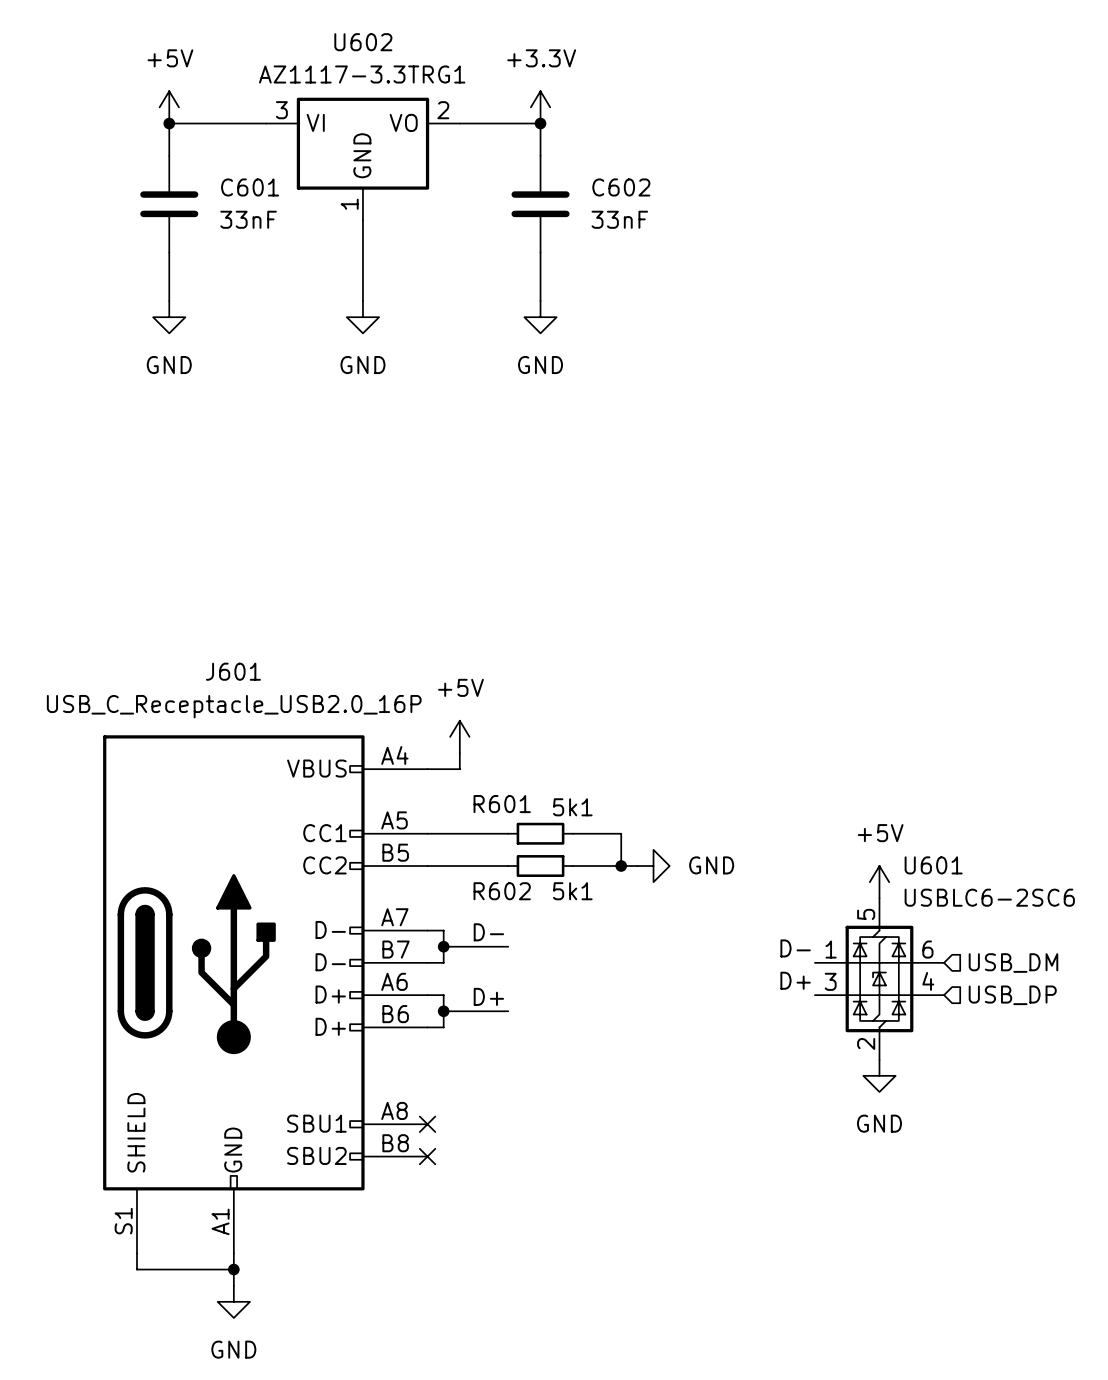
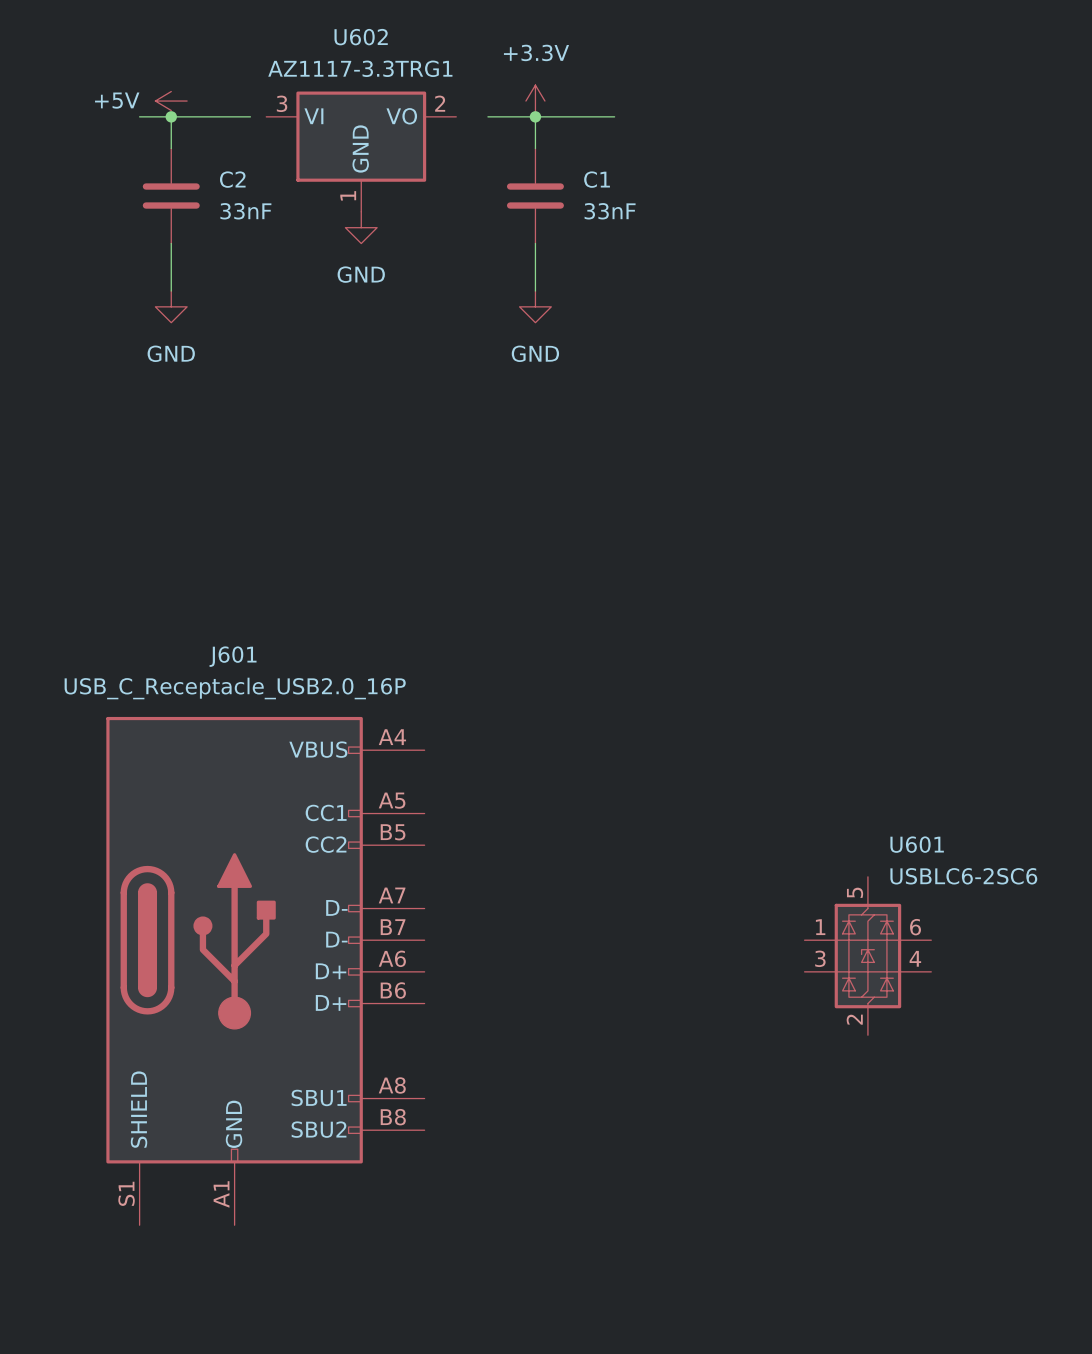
power symbol rotation: 0° (169, 107) -> 90° counterclockwise (171, 101)
wire: none -> (139, 116) (171, 116)
wire: (249, 123) (266, 123) -> none
wire: (459, 123) (492, 123) -> none
wire: none -> (535, 116) (614, 116)
C601 name: C601 (250, 187) -> C2 (232, 179)
C602 name: C602 (621, 187) -> C1 (597, 179)
wire: (362, 220) (362, 301) -> none
power symbol position: GND (362, 317) -> GND (361, 227)
power symbol: +5V (459, 736) -> none
wire: (459, 753) (459, 769) (427, 769) -> none
wire: (427, 833) (508, 833) -> none
R601: 5k1 (540, 833) -> none
wire: (572, 833) (621, 833) (621, 866) -> none
wire: (427, 866) (508, 866) -> none
R602: 5k1 (540, 866) -> none
wire: (572, 866) (637, 866) -> none
junction: (621, 866) -> none
power symbol: GND (653, 866) -> none
power symbol: +5V (879, 882) -> none
wire: (427, 930) (443, 930) (443, 962) (427, 962) -> none
label: D- (488, 932) -> none
wire: (443, 946) (508, 946) -> none
junction: (443, 946) -> none
label: D- (795, 948) -> none
hierarchical label: USB_DM (1013, 963) -> none
label: D+ (795, 980) -> none
wire: (427, 995) (443, 995) (443, 1027) (427, 1027) -> none
hierarchical label: USB_DP (1012, 995) -> none
label: D+ (488, 996) -> none
wire: (443, 1011) (508, 1011) -> none
junction: (443, 1011) -> none
power symbol: GND (879, 1075) -> none
no-connect mark: (427, 1124) -> none
no-connect mark: (427, 1156) -> none
wire: (136, 1253) (136, 1269) (233, 1269) -> none
wire: (233, 1253) (233, 1285) -> none
junction: (233, 1269) -> none
power symbol: GND (233, 1301) -> none

